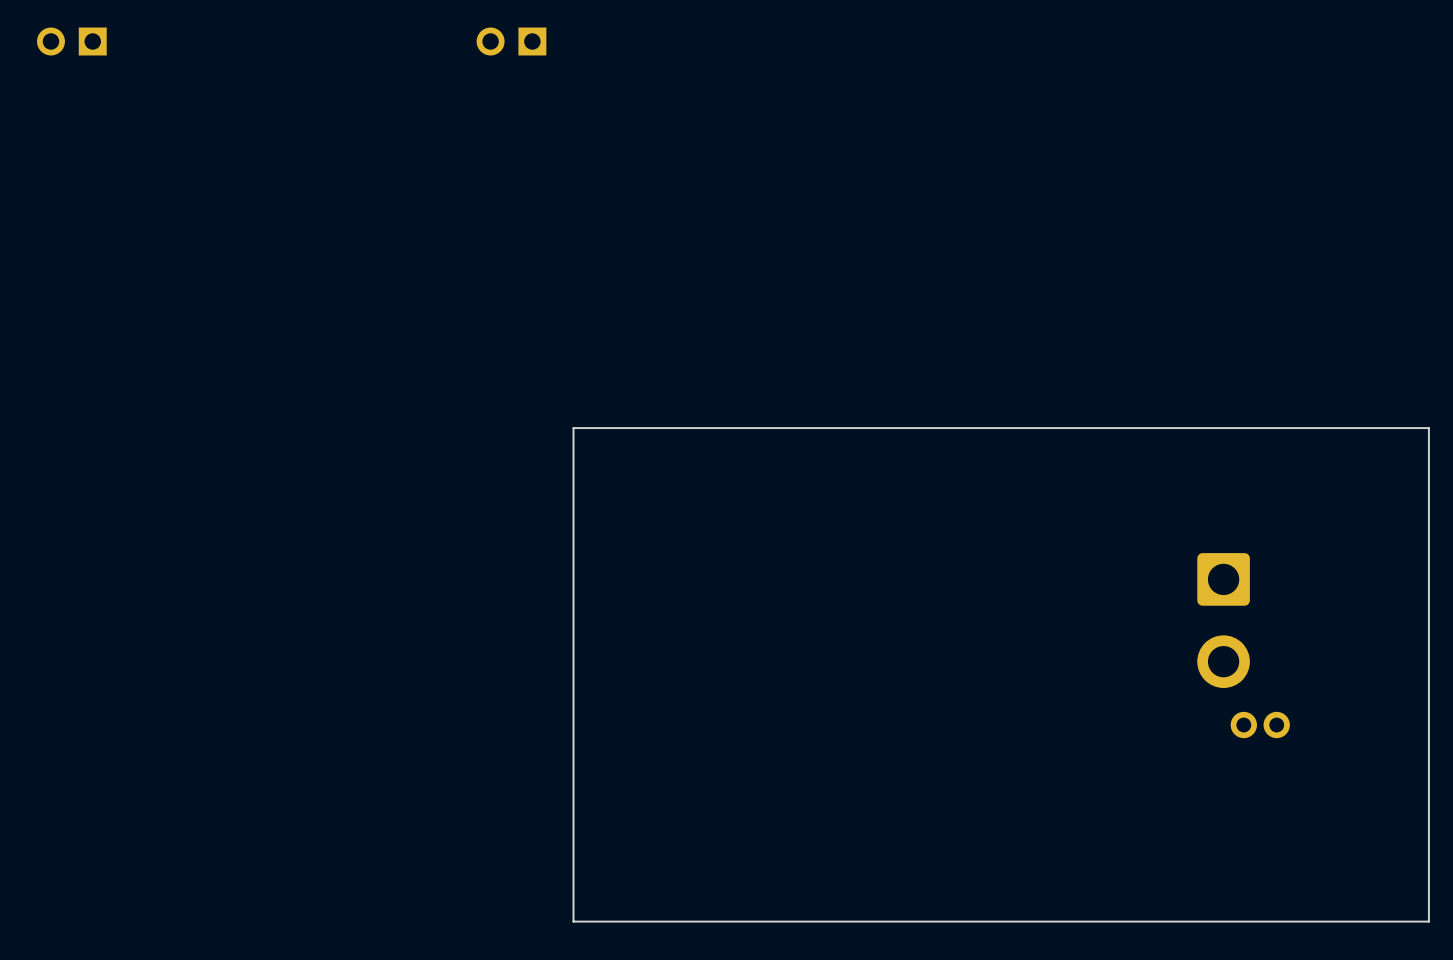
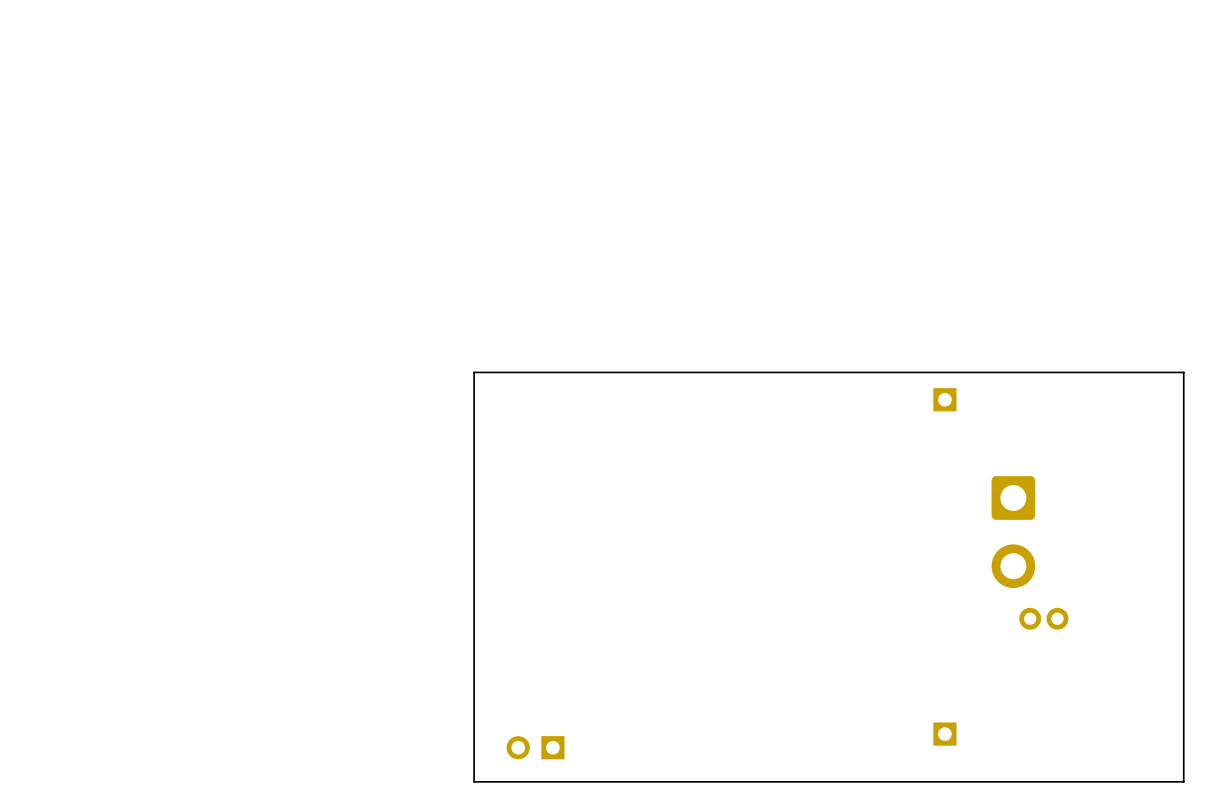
part: (71, 41) -> none
part: (511, 41) -> none
part: none -> (944, 399)
part: none -> (944, 734)
part: none -> (535, 747)

